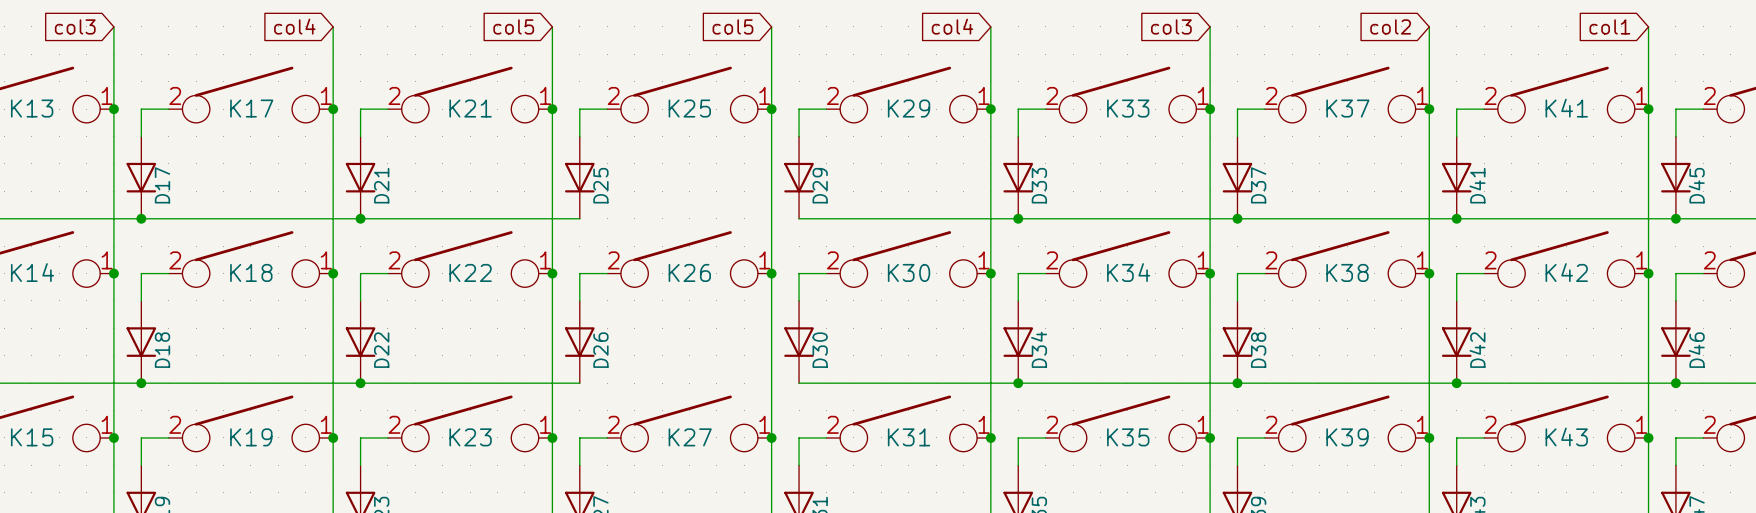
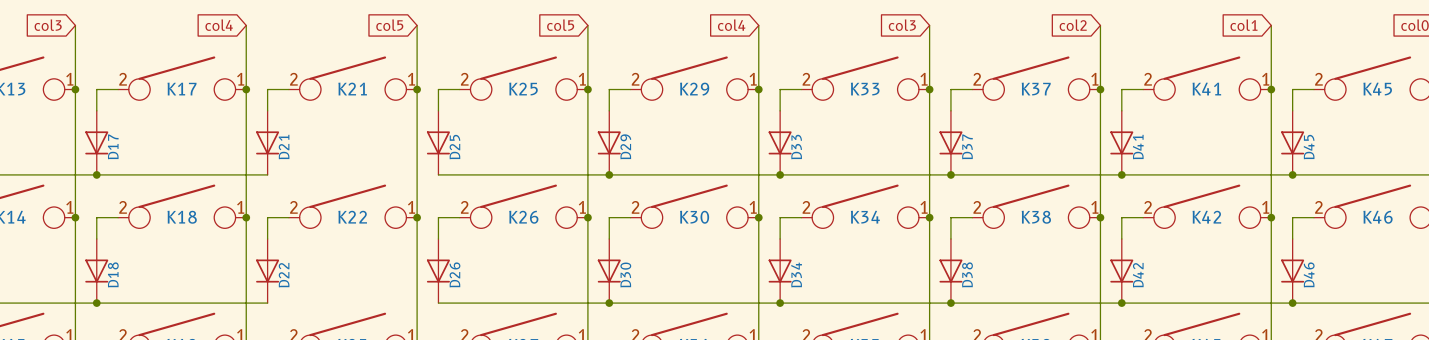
wire: (360, 218) (579, 218) -> (609, 174) (438, 174)
junction: (360, 218) -> none
junction: none -> (609, 174)
wire: (360, 383) (579, 383) -> (609, 303) (438, 303)
junction: (360, 383) -> none
junction: none -> (609, 303)

